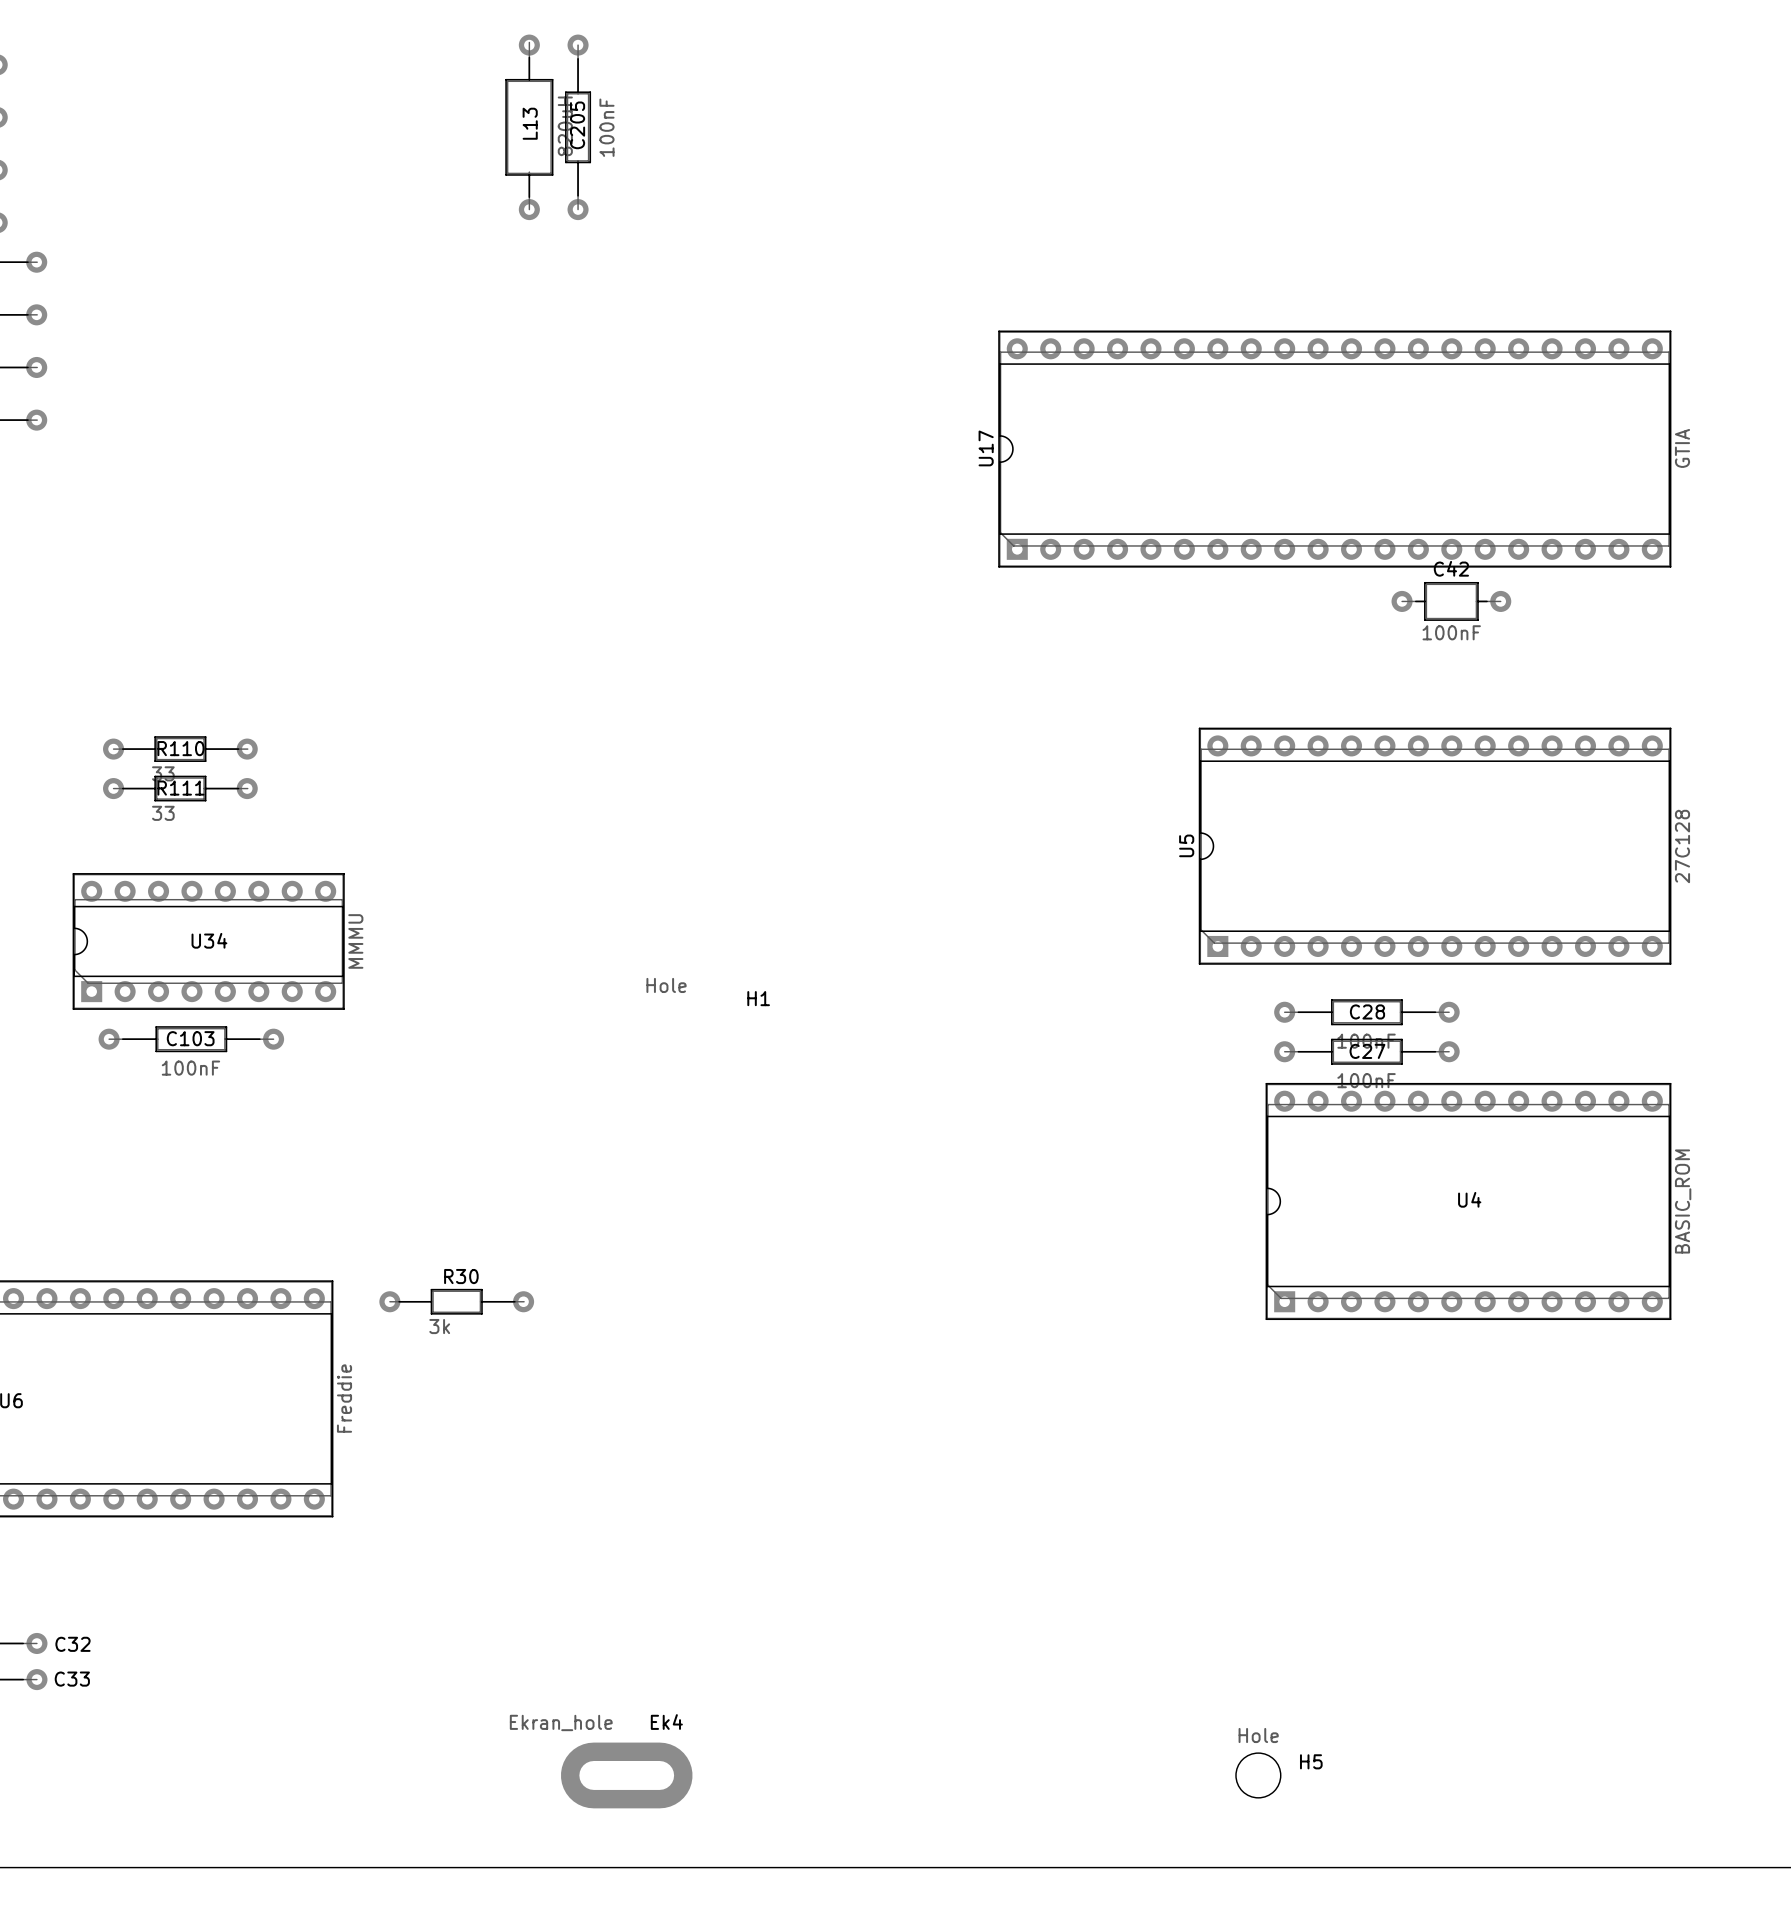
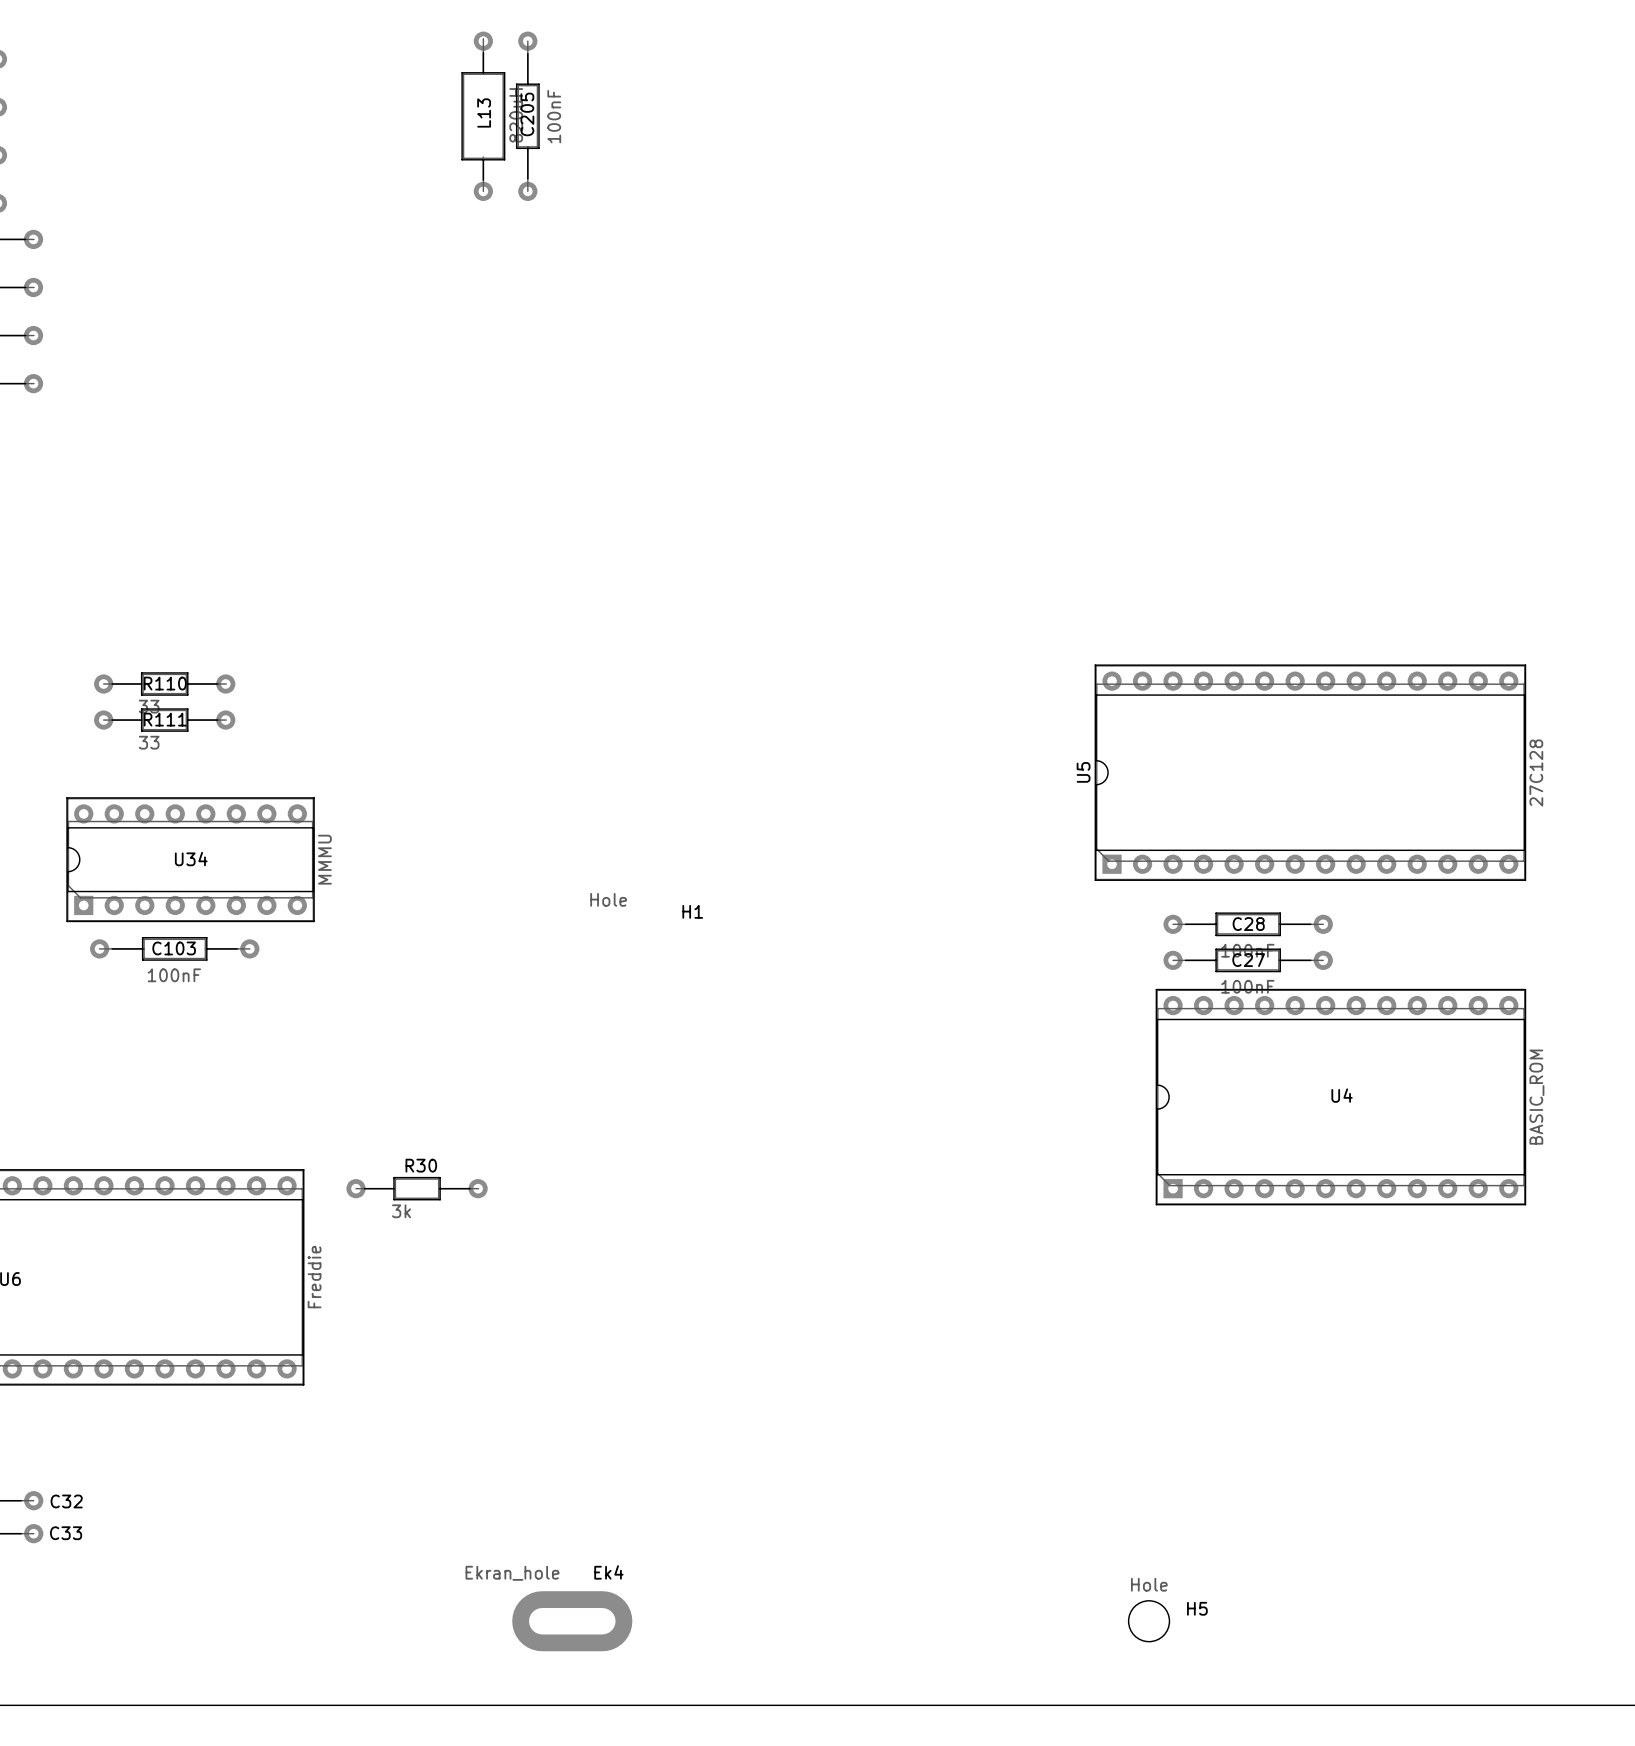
U17: GTIA (1334, 449) -> none
C42: 100nF (1451, 601) -> none

